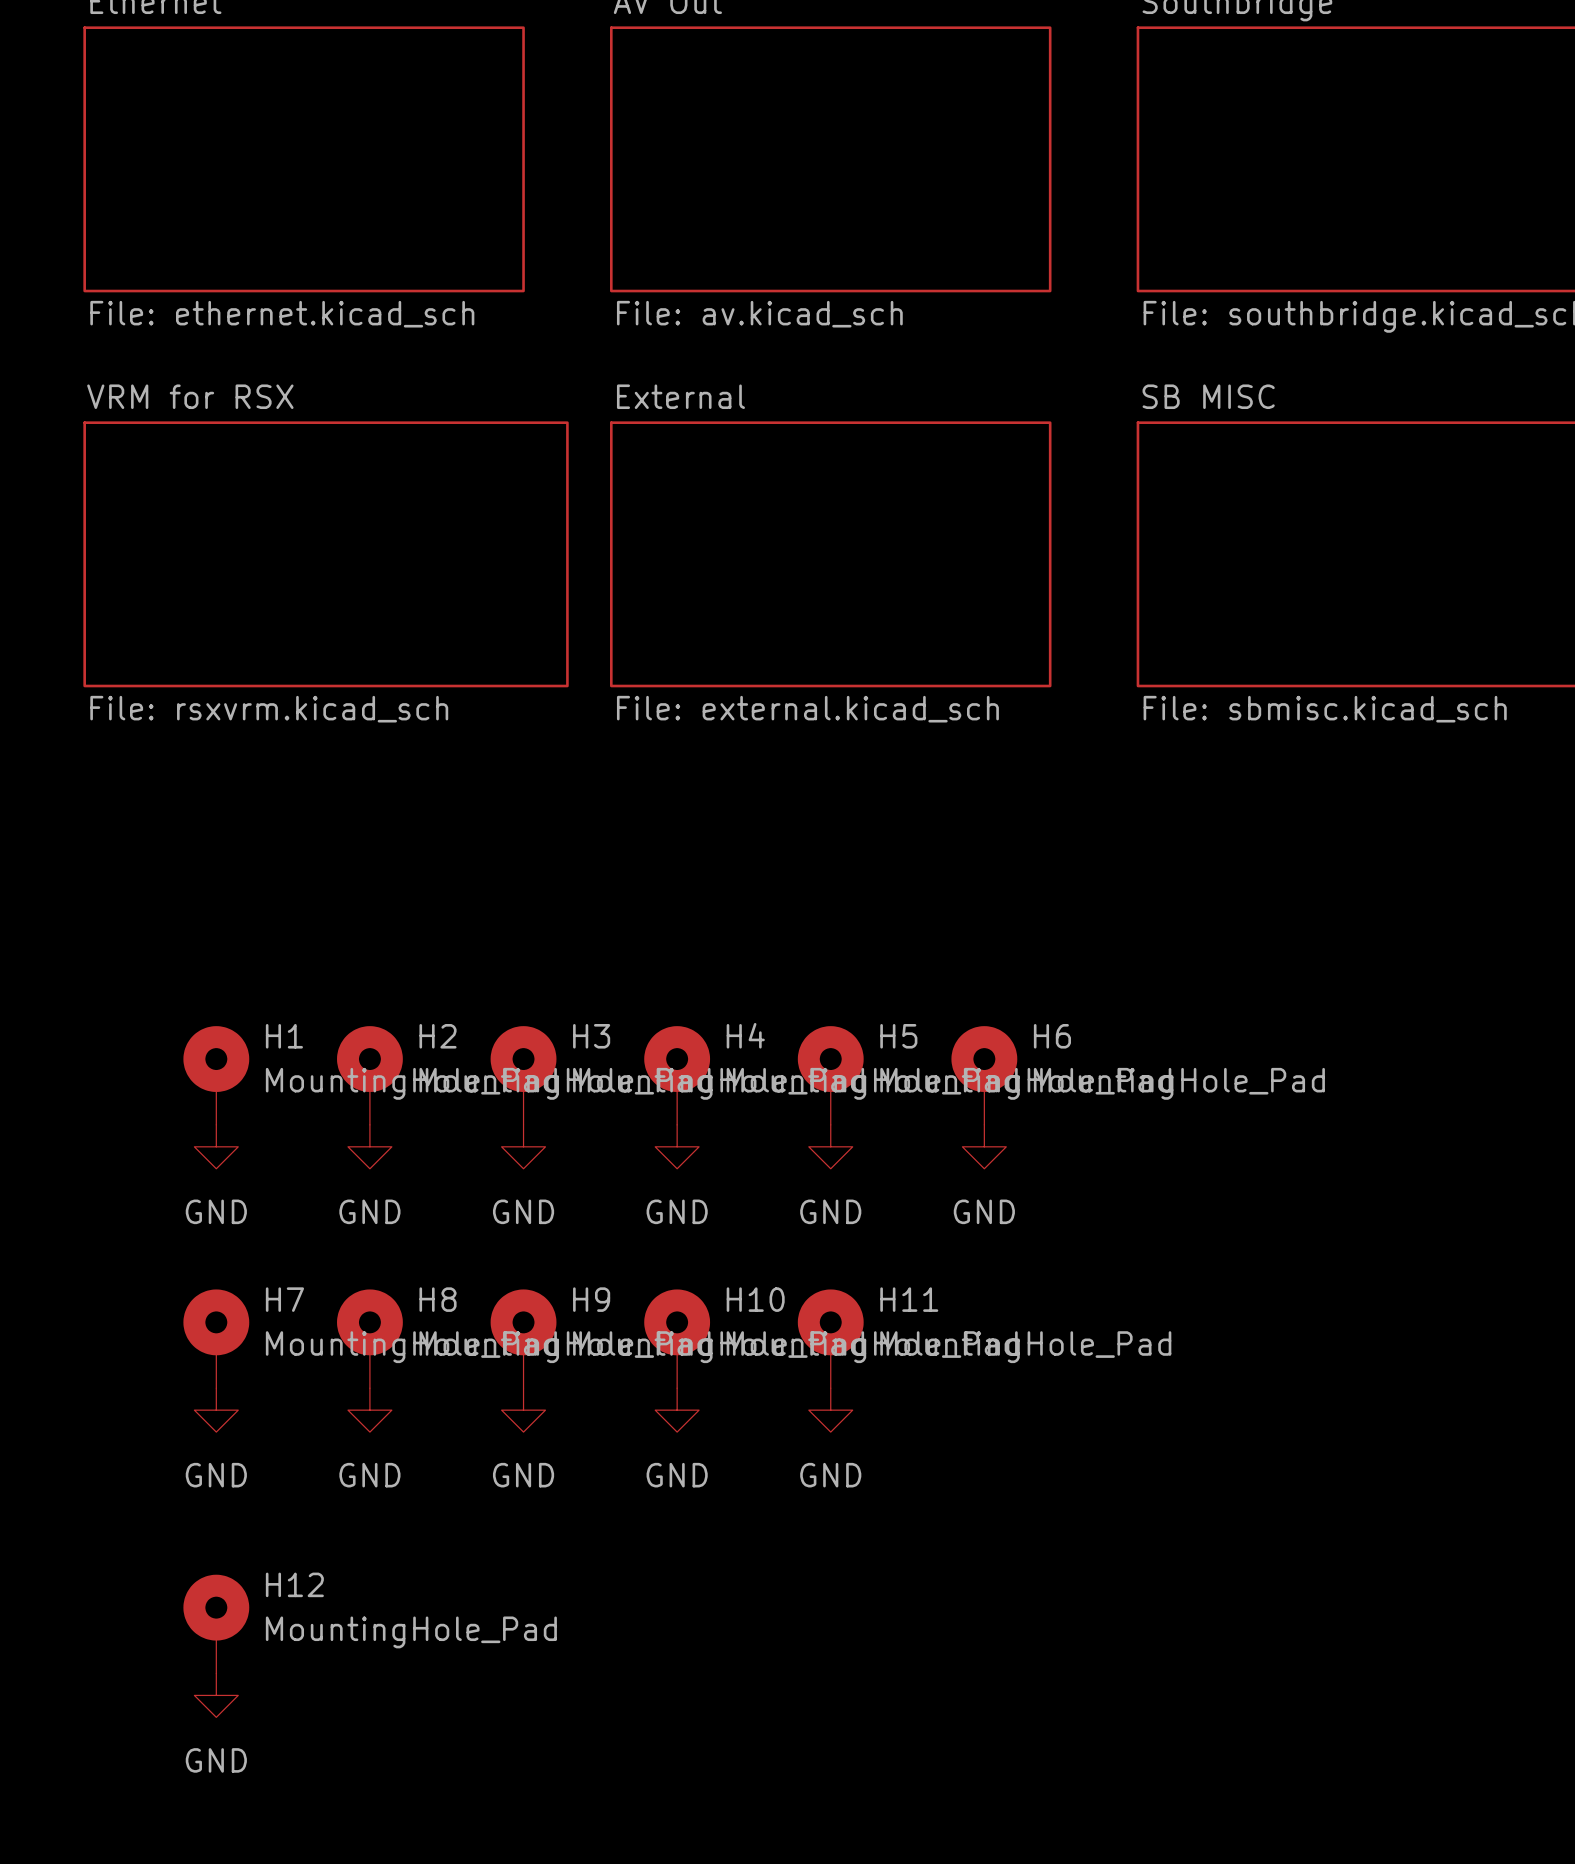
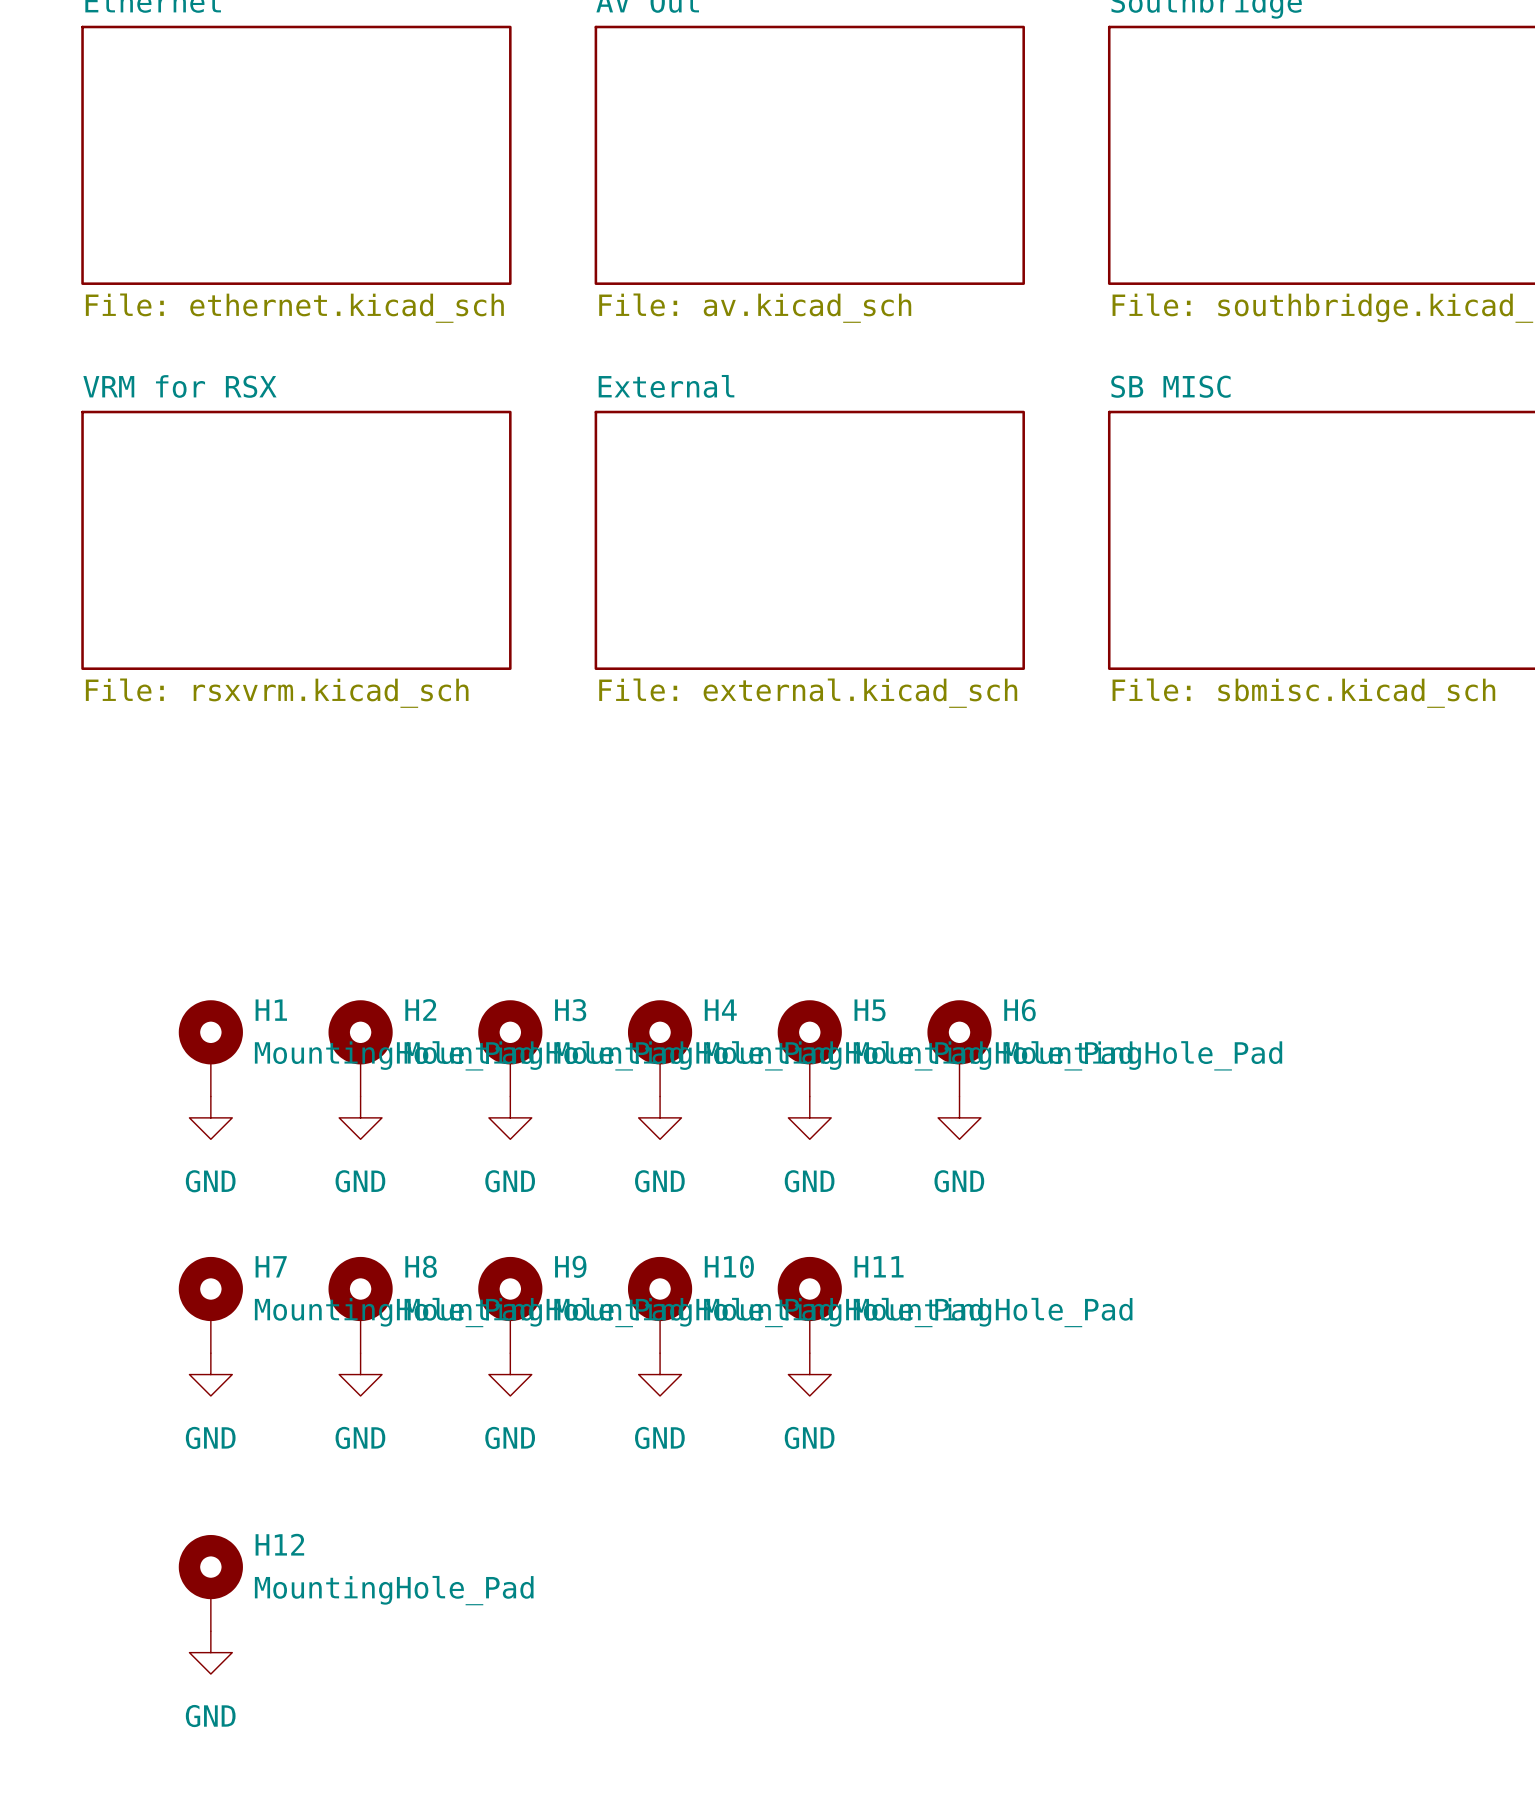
sheet VRM for RSX: none -> File: rsxvrm.kicad_sch (296, 540)
sheet VRM for RSX: File: rsxvrm.kicad_sch (326, 554) -> none

